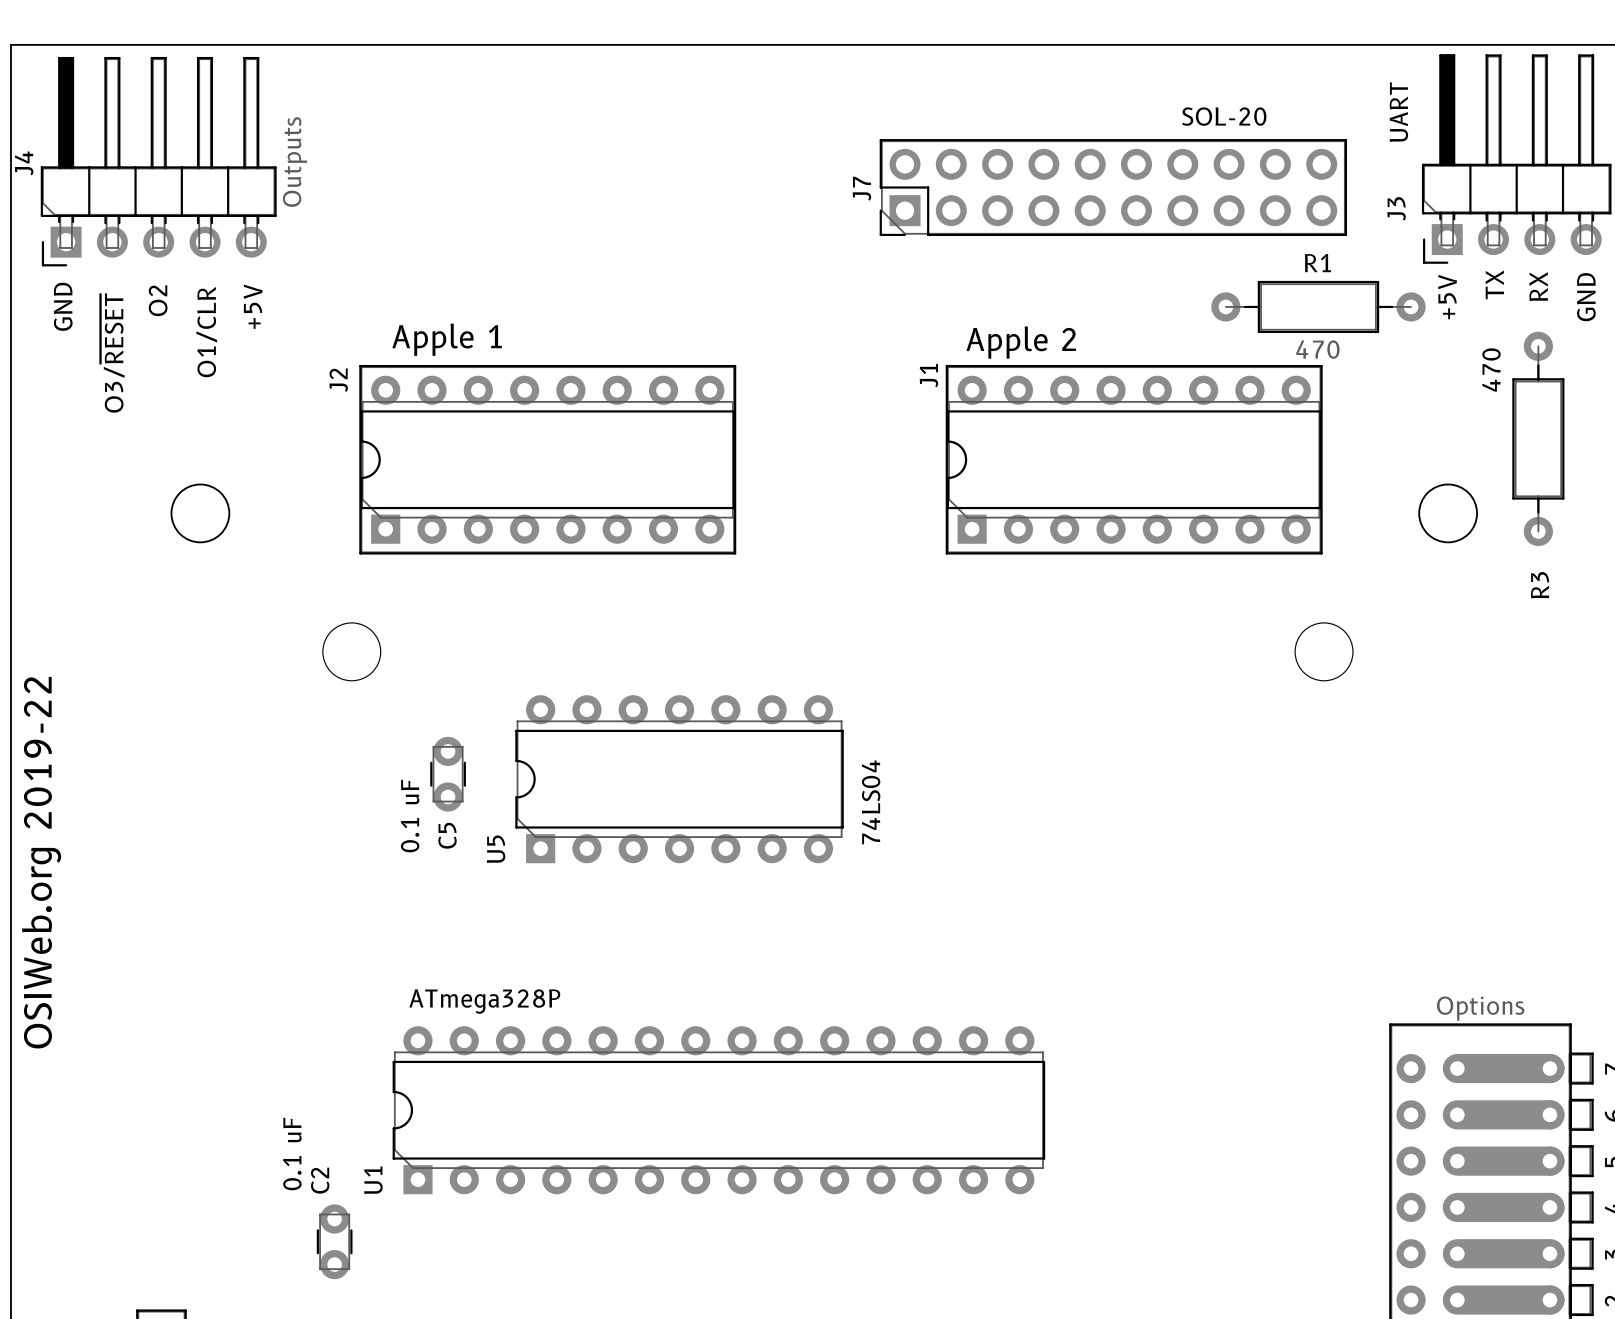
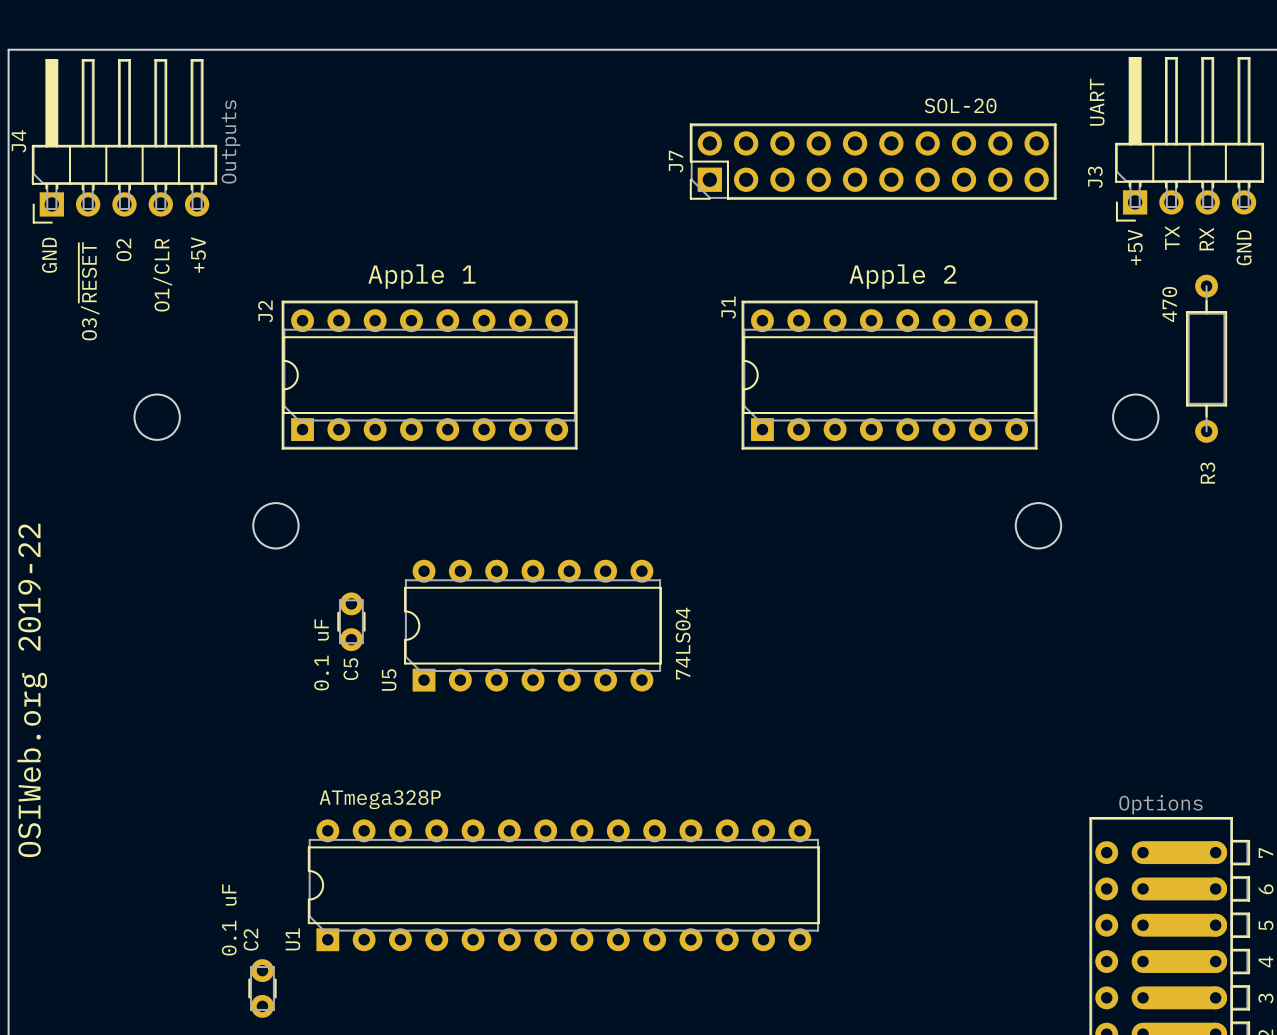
R1: 470 (1318, 306) -> none
J2 value position: Apple 1 (447, 339) -> Apple 1 (422, 276)
J1 value position: Apple 2 (1021, 342) -> Apple 2 (902, 276)

